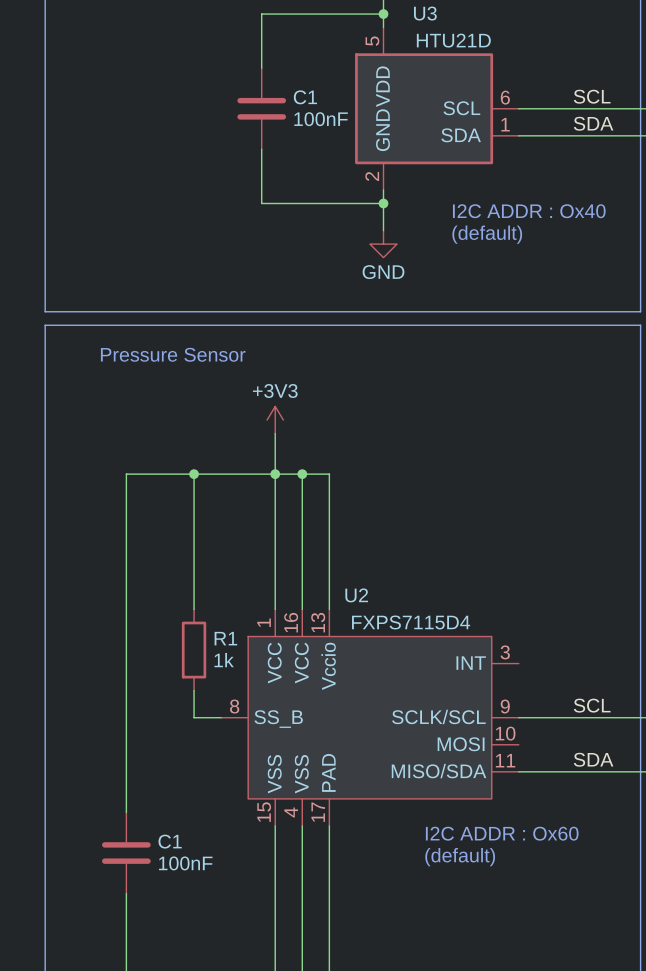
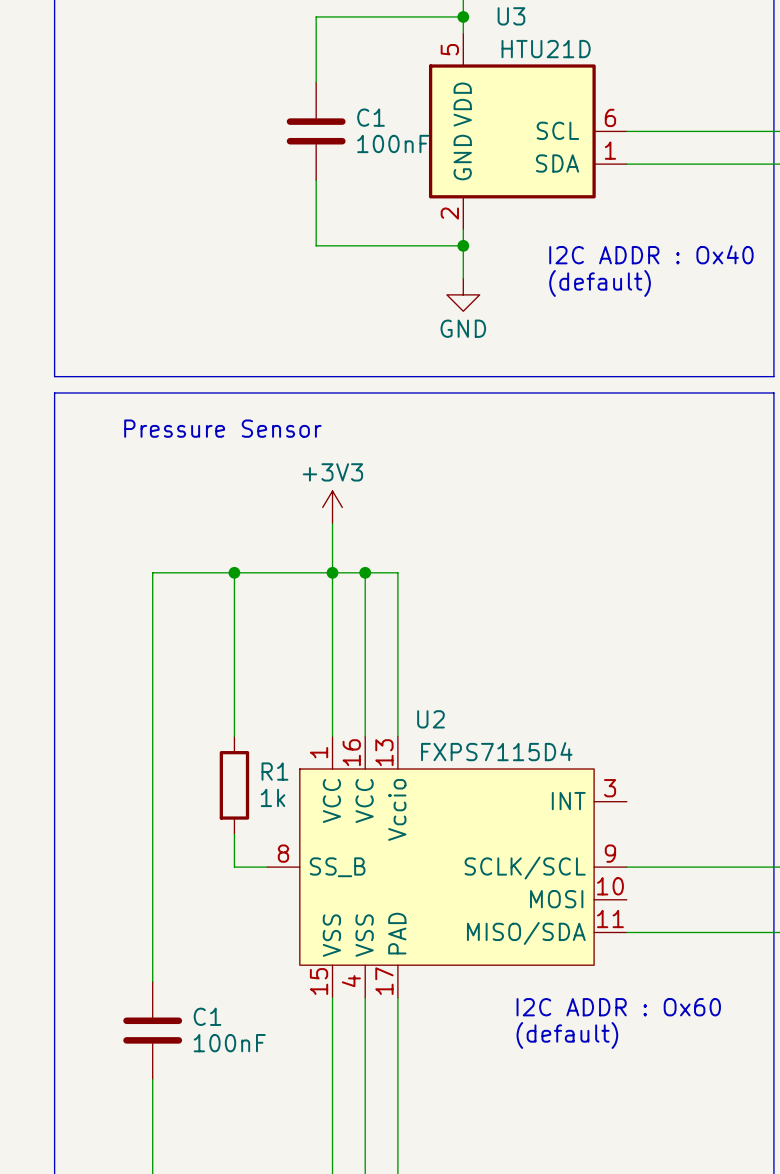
label: SCL (592, 96) -> none
label: SDA (593, 123) -> none
label: SCL (592, 705) -> none
label: SDA (593, 759) -> none

